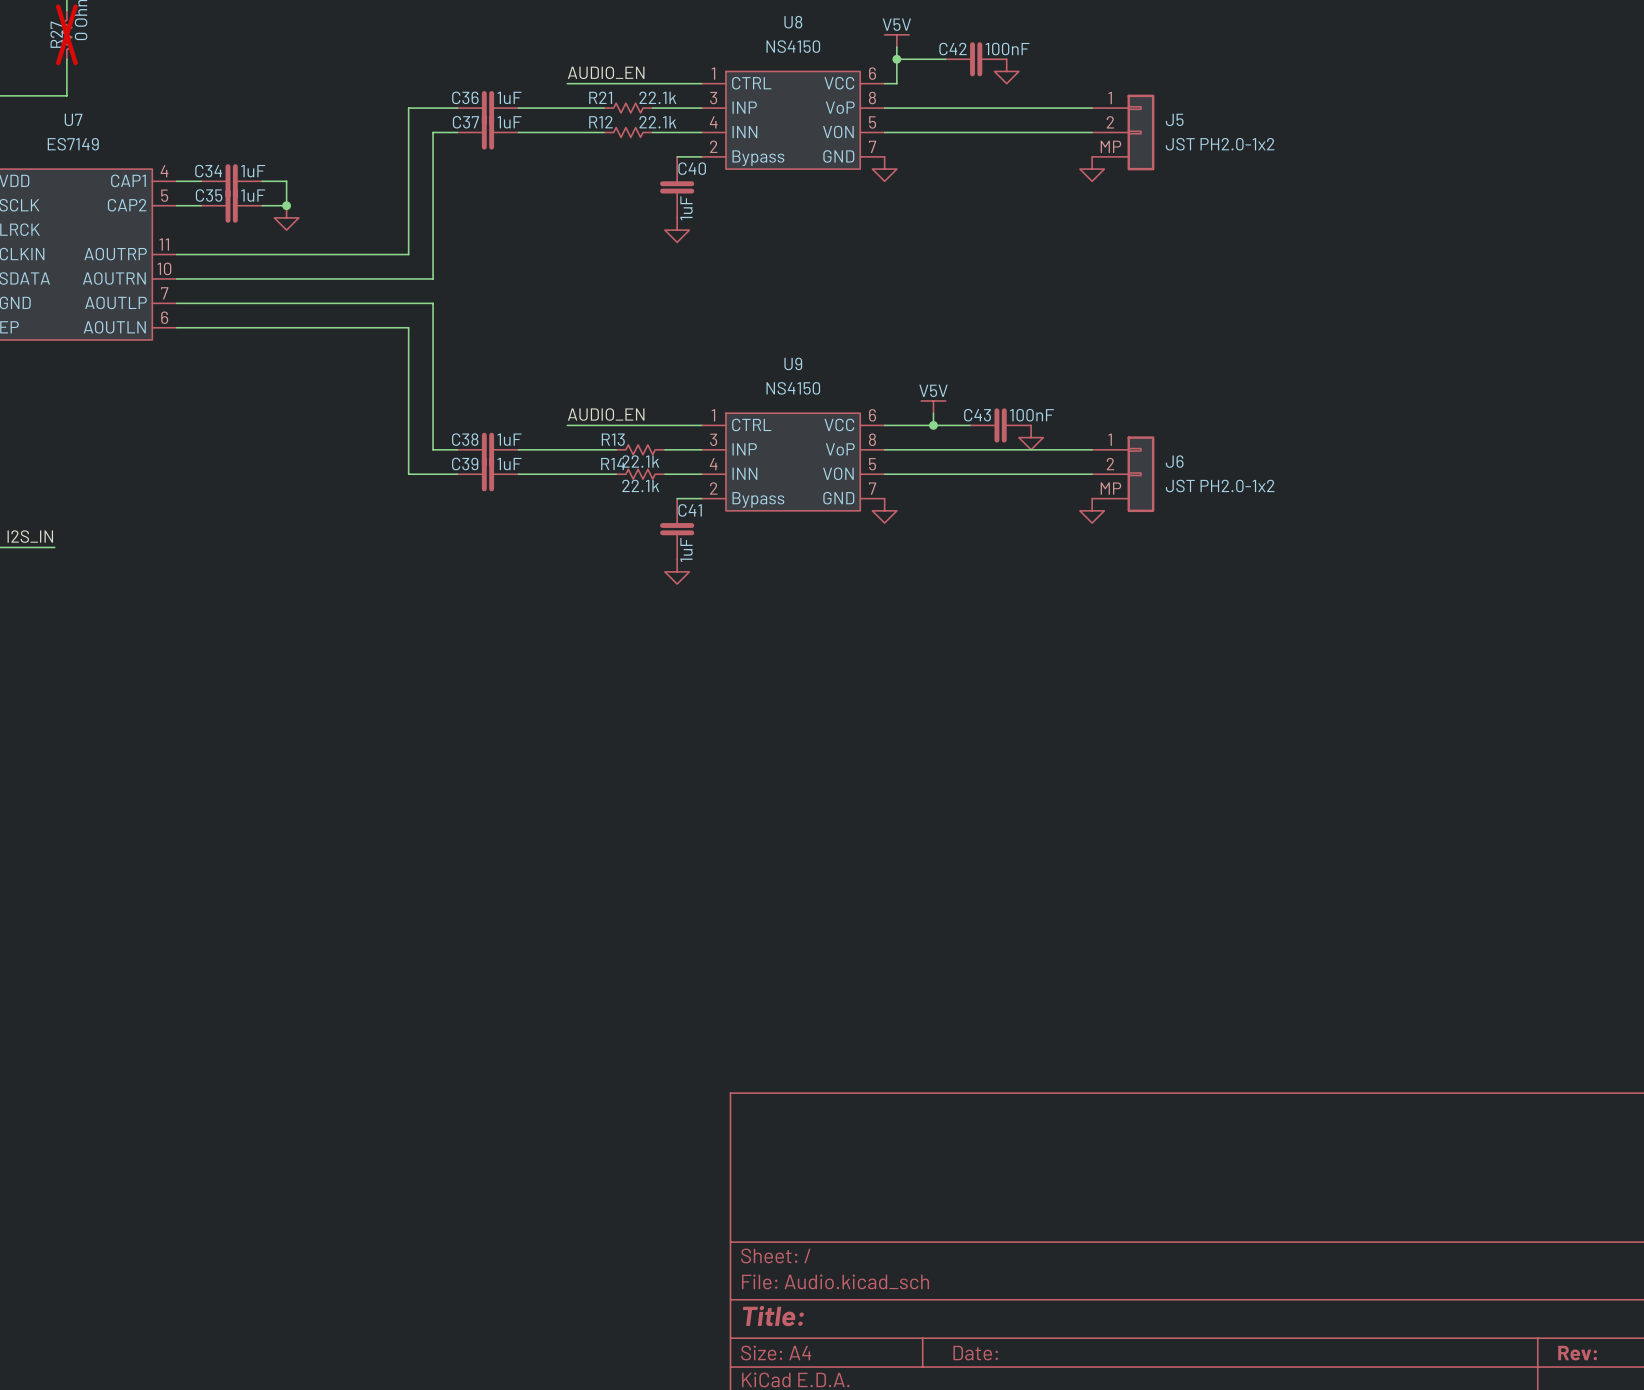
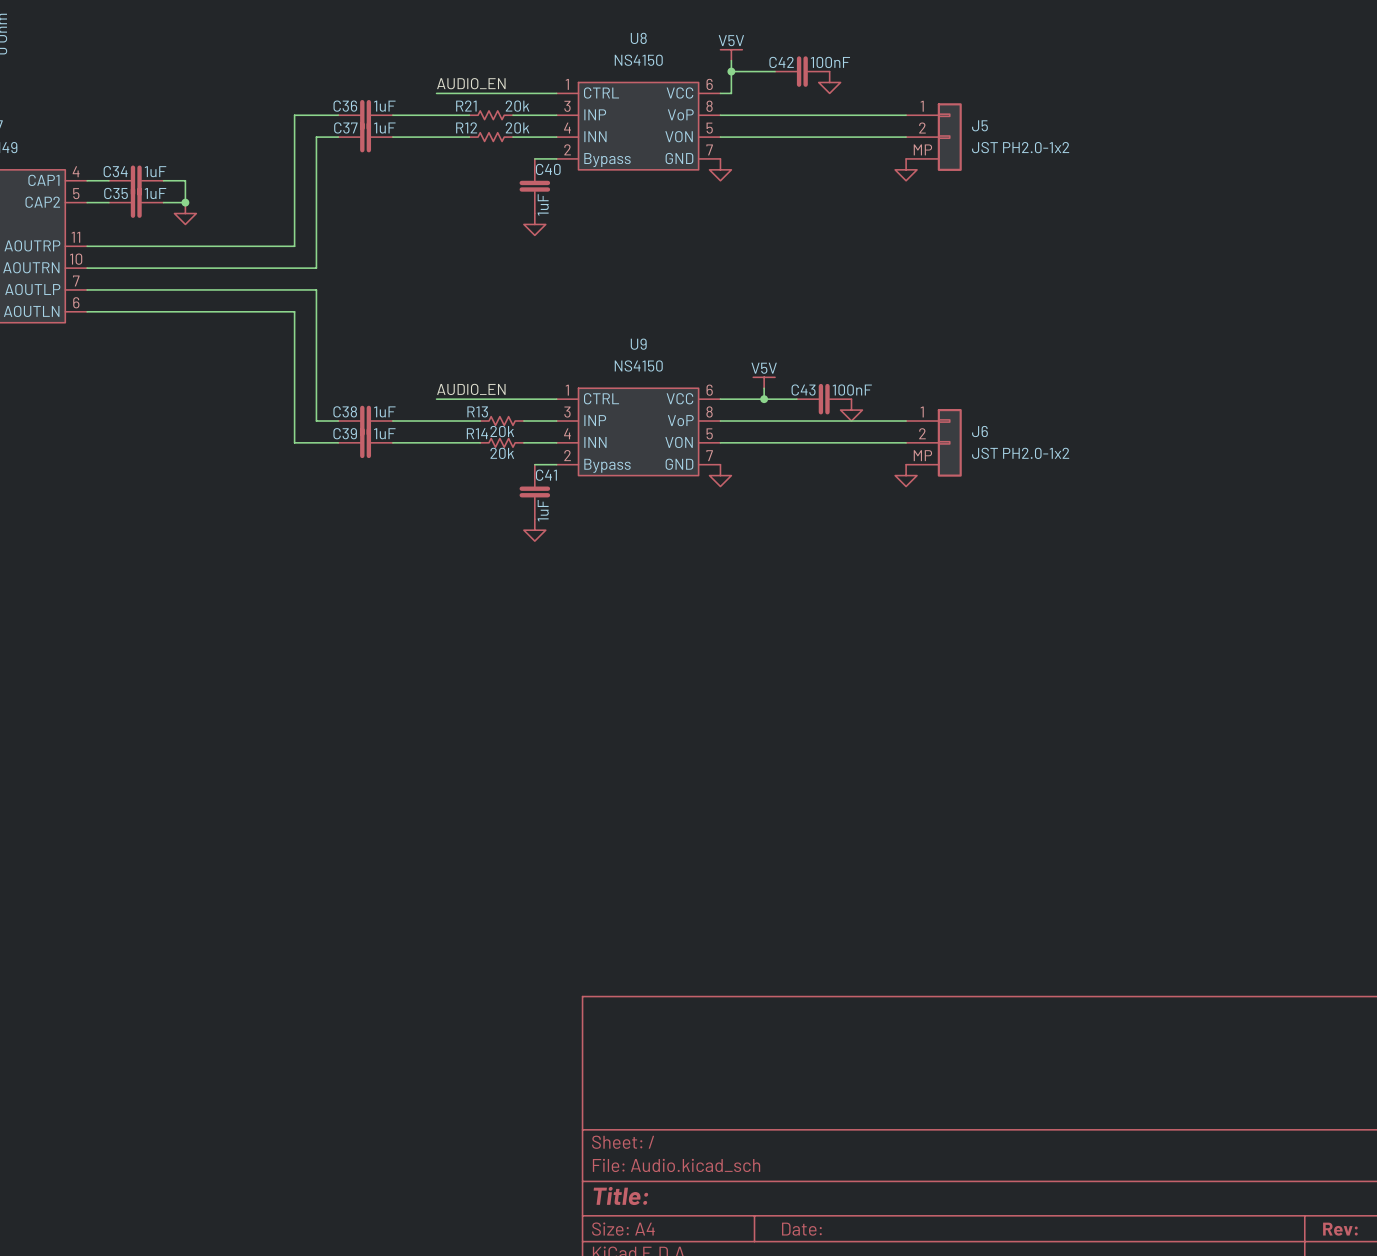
R21 text: 22.1k (657, 97) -> 20k (517, 106)
R12 text: 22.1k (657, 122) -> 20k (517, 127)
R13 text: 22.1k (640, 461) -> 20k (502, 431)
R14 text: 22.1k (640, 485) -> 20k (502, 453)

